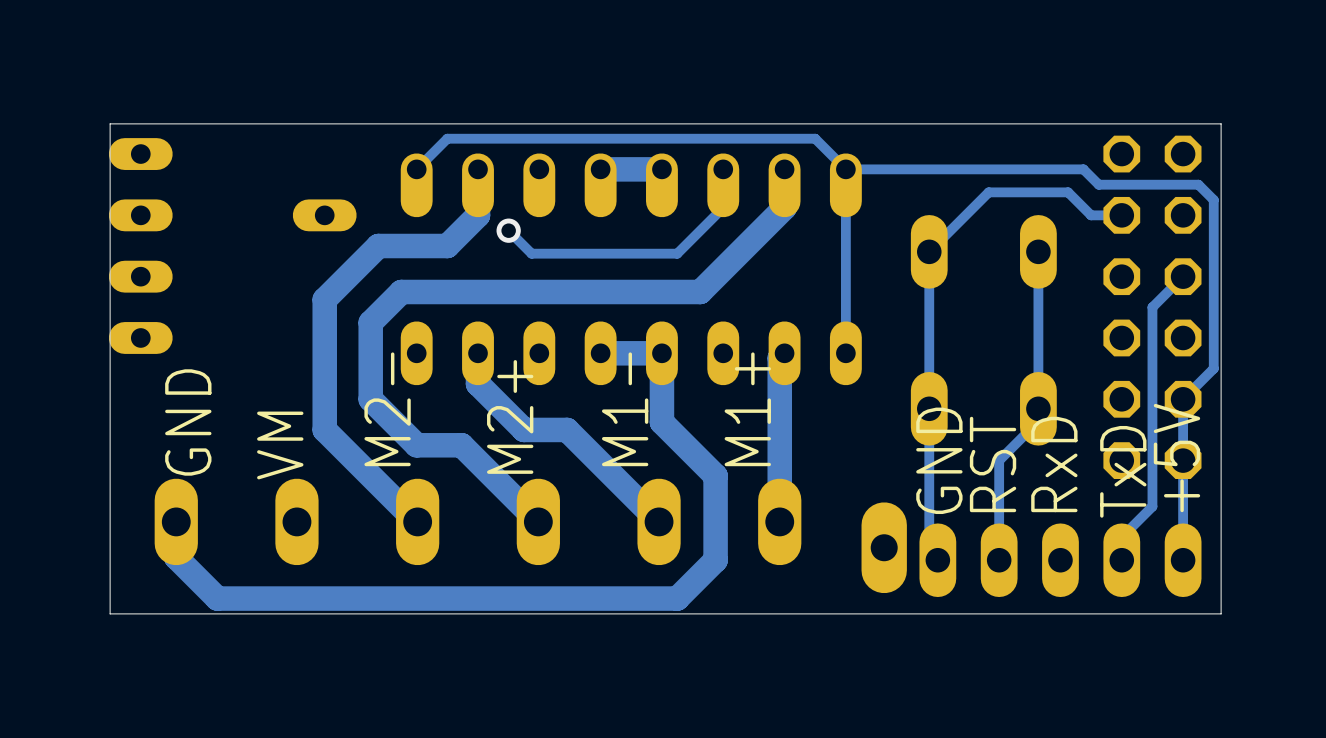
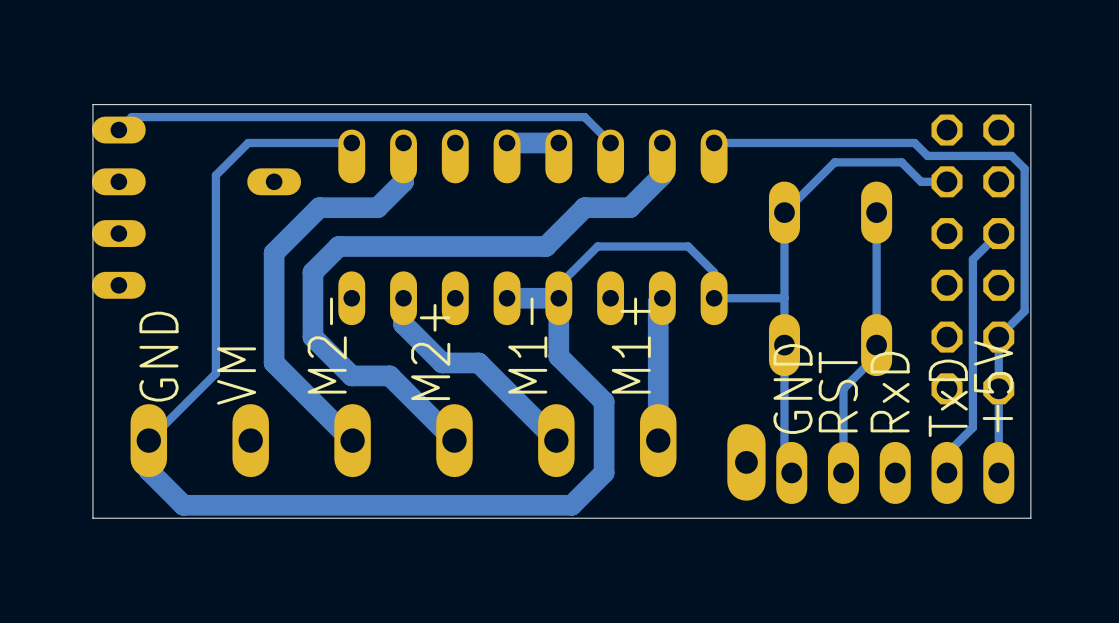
track: (447, 138) (416, 169) -> (377, 117) (131, 117) (118, 130)
track: (692, 138) (815, 138) (845, 169) (845, 322) -> (584, 117) (610, 142)
track: none -> (351, 142) (248, 142) (215, 175) (215, 373) (148, 440)
track: (723, 169) (723, 207) (677, 253) (531, 253) (508, 230) -> none
via: (508, 230) -> none
track: (746, 246) (700, 292) (646, 292) -> (629, 207) (584, 207) (545, 246)
track: none -> (714, 272) (688, 246) (597, 246) (558, 285) (558, 298)
track: none -> (784, 298) (714, 298)

